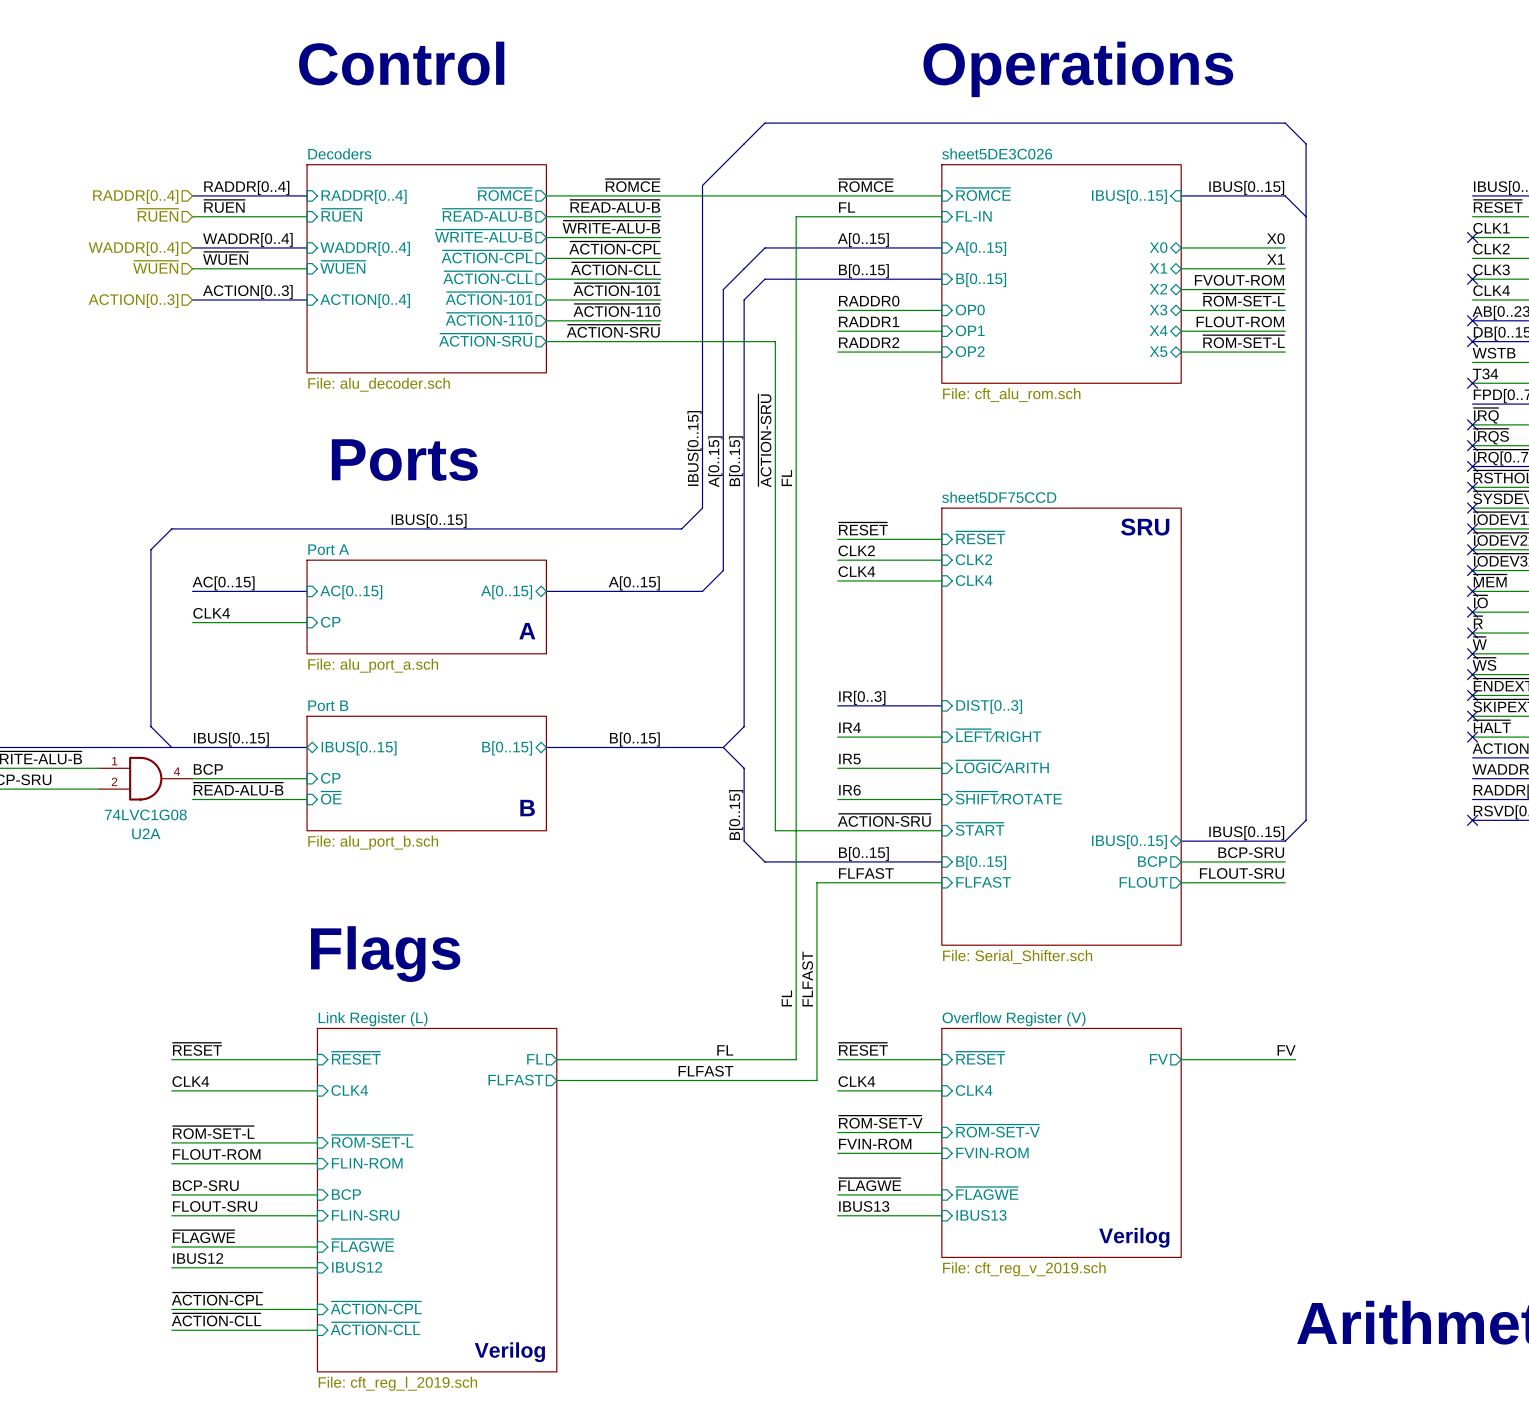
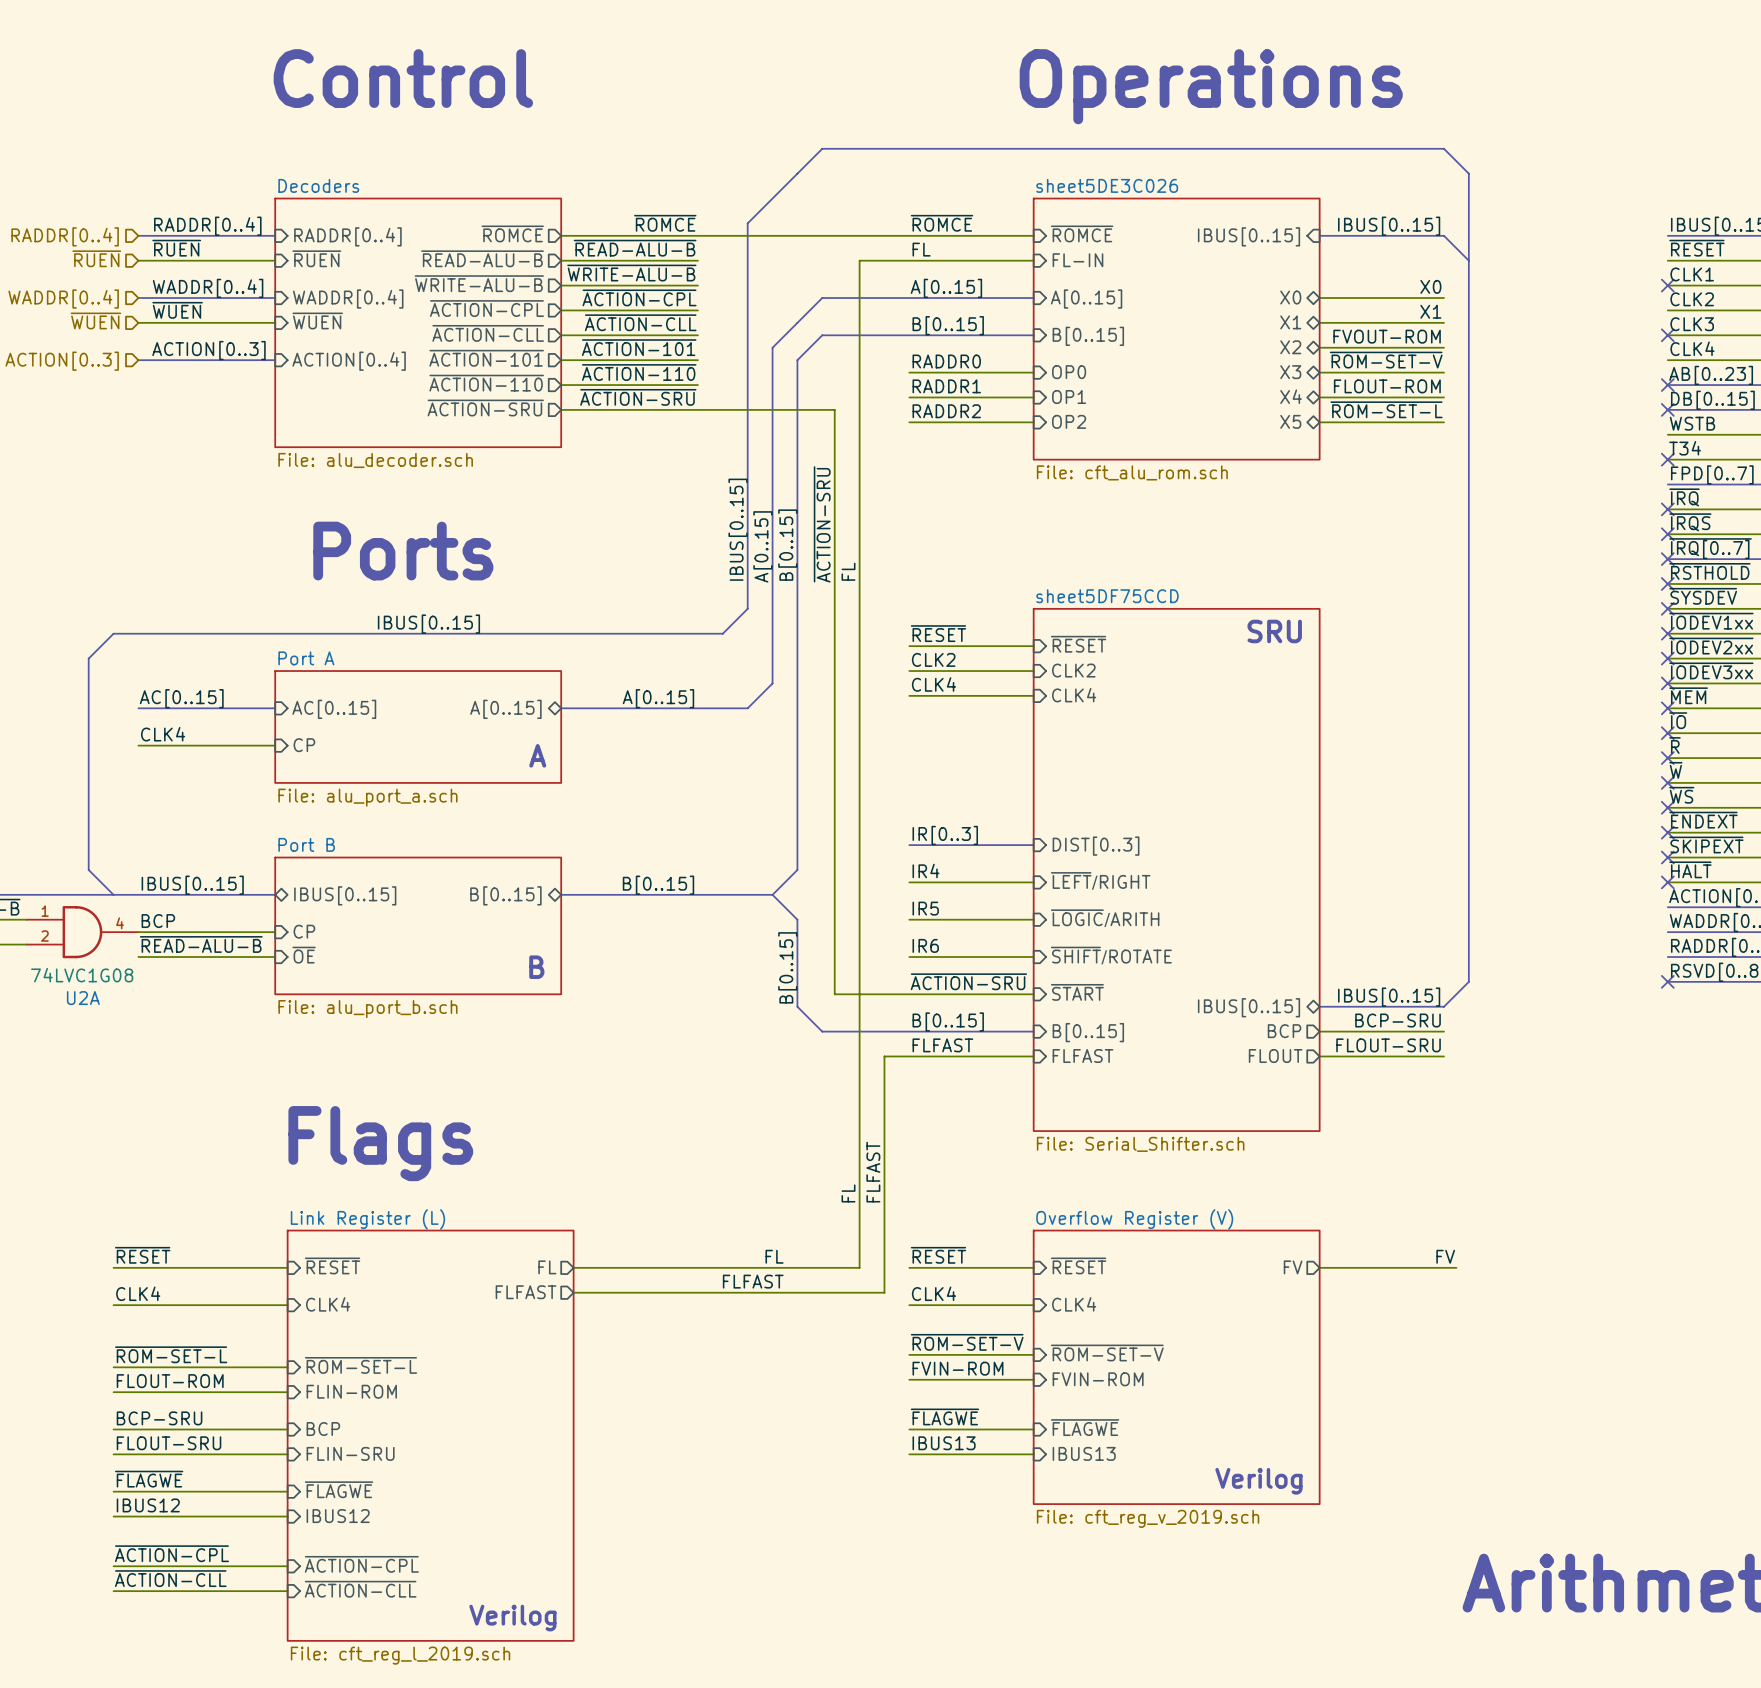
label: ~{ROM-SET-L} (1243, 300) -> ~{ROM-SET-V} (1386, 360)

